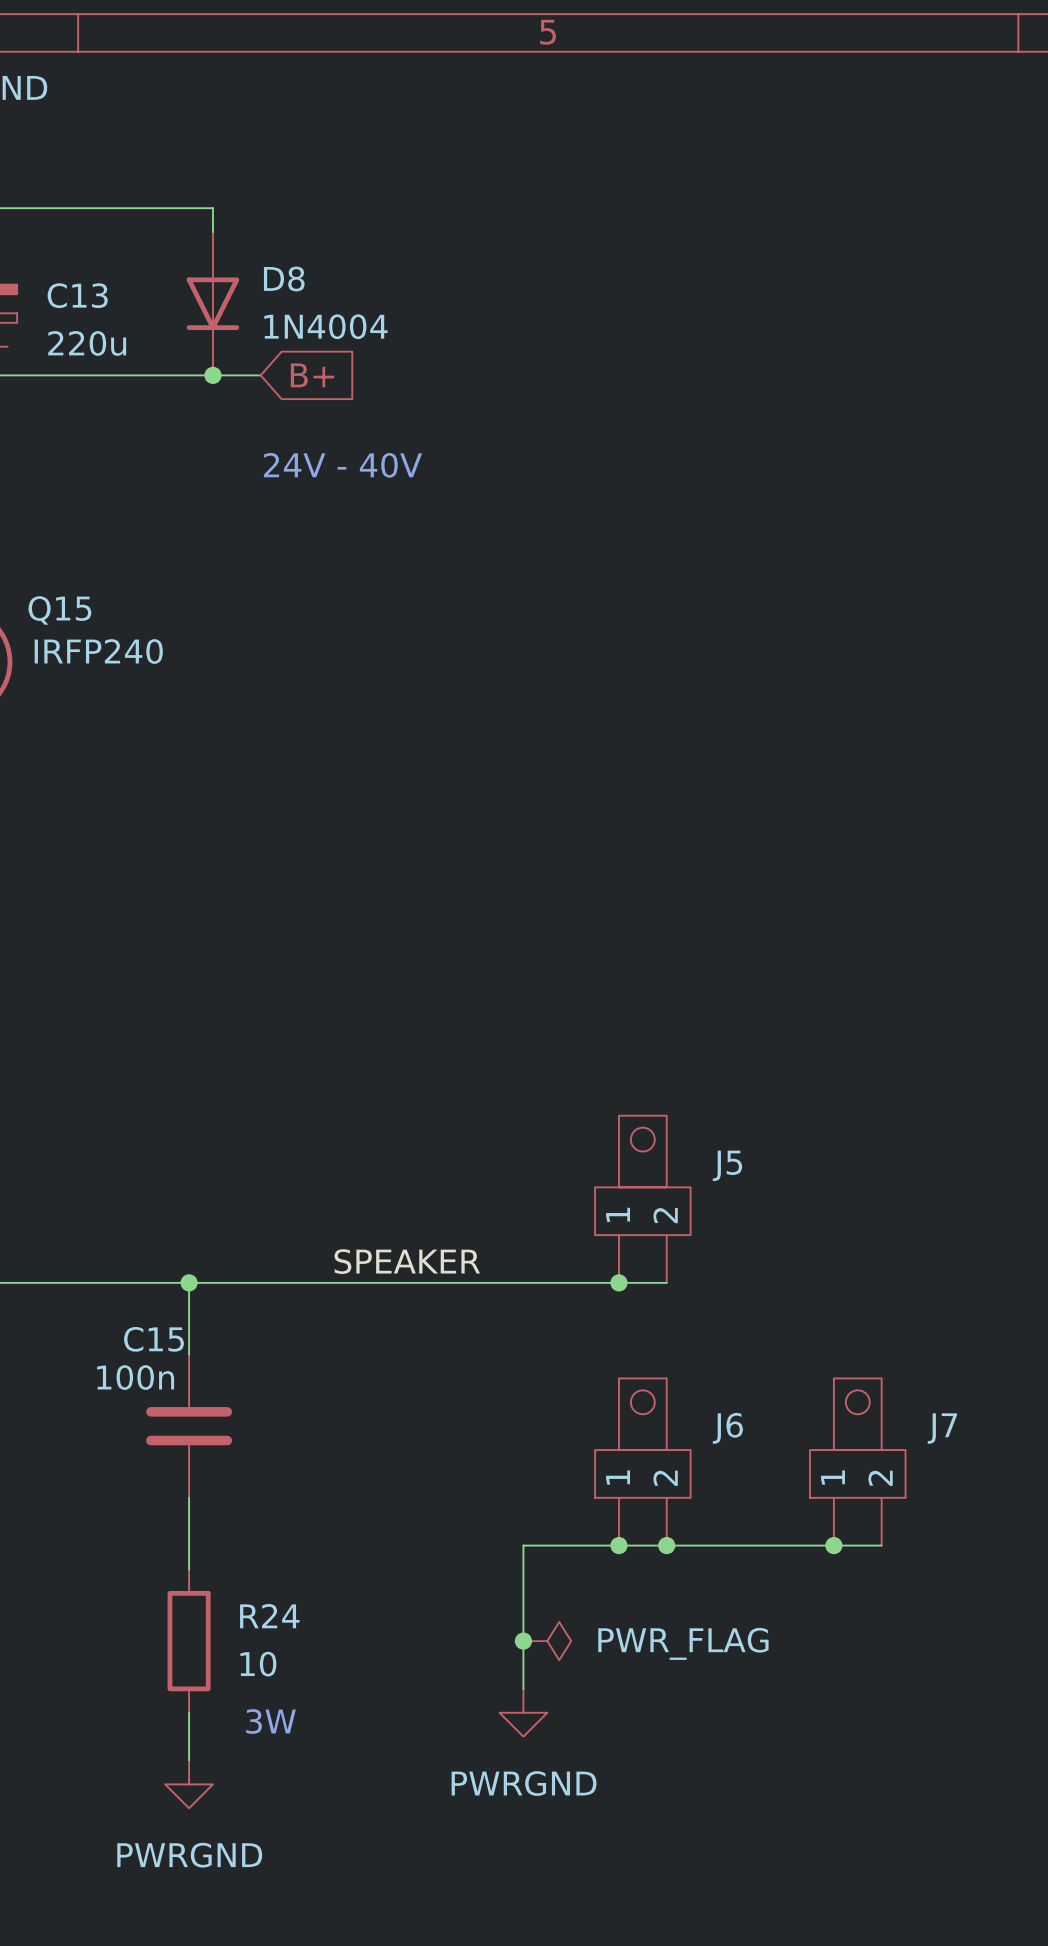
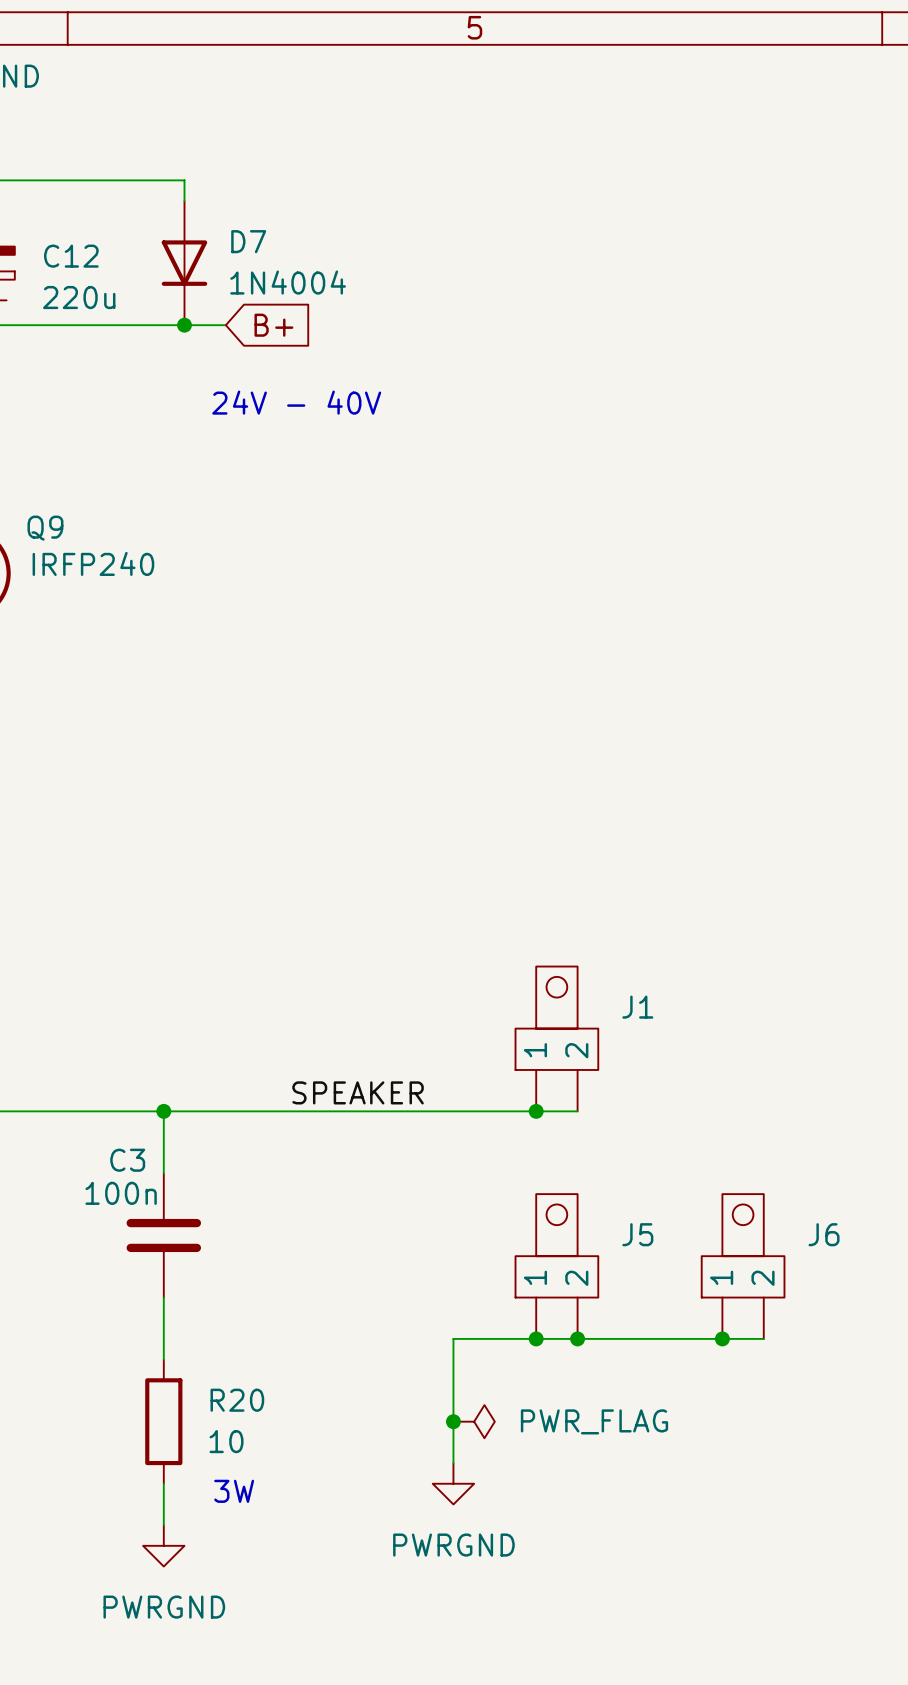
D8 name: D8 (284, 278) -> D7 (248, 241)
C13 name: C13 (77, 295) -> C12 (71, 256)
Q15 name: Q15 (59, 610) -> Q9 (45, 528)
J5 name: J5 (727, 1165) -> J1 (637, 1007)
C15 name: C15 (153, 1339) -> C3 (127, 1160)
J6 name: J6 (727, 1428) -> J5 (637, 1234)
J7 name: J7 (942, 1428) -> J6 (824, 1234)
R24 name: R24 (269, 1616) -> R20 (237, 1400)

